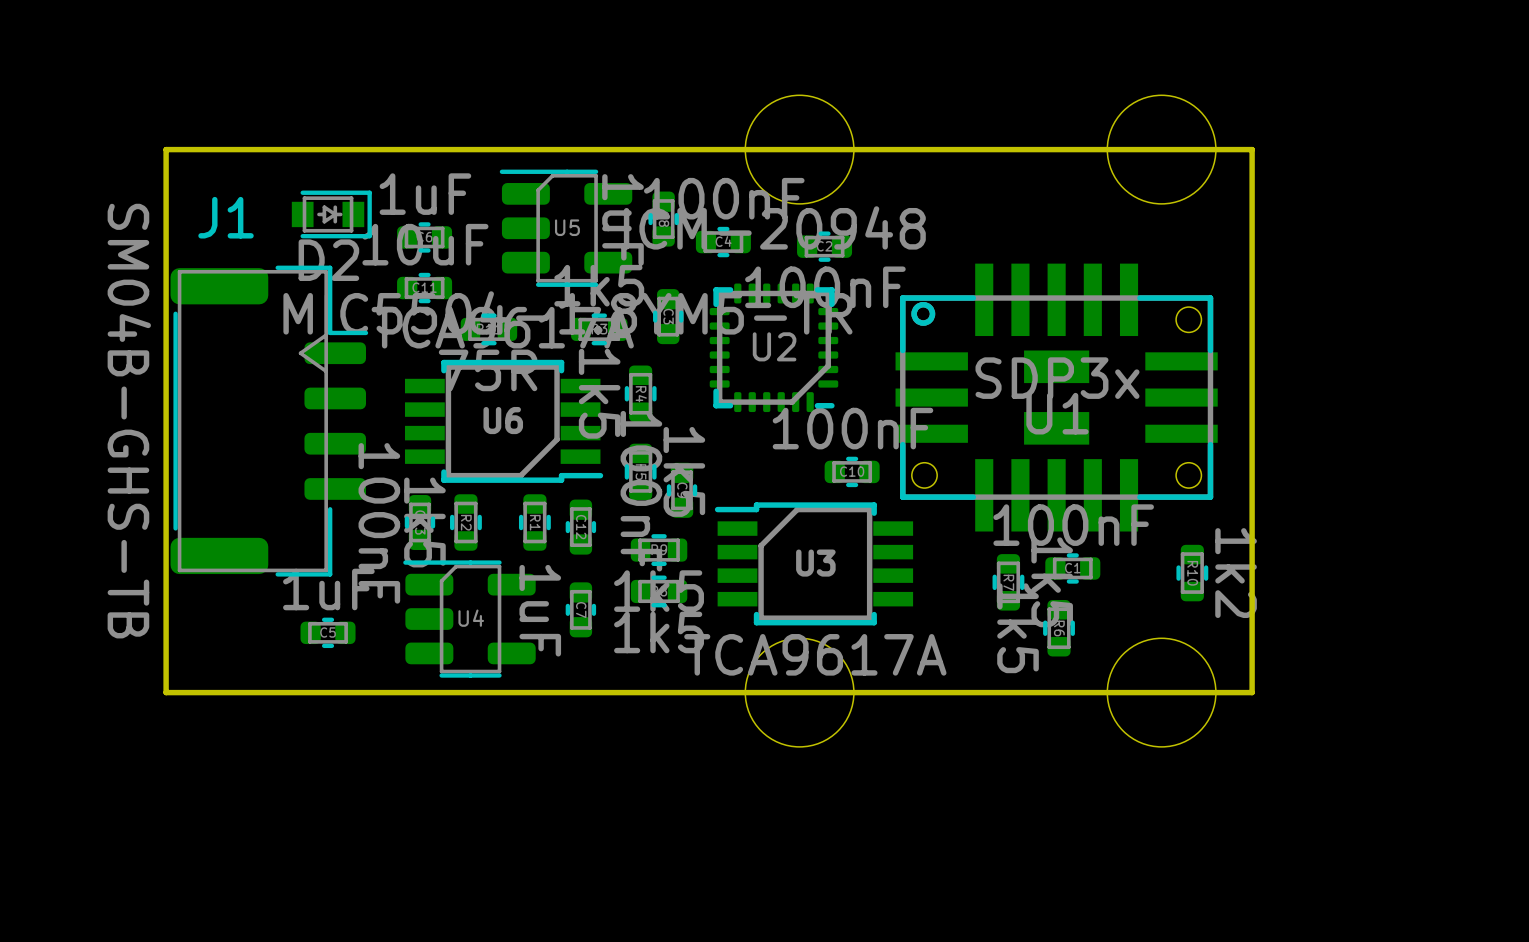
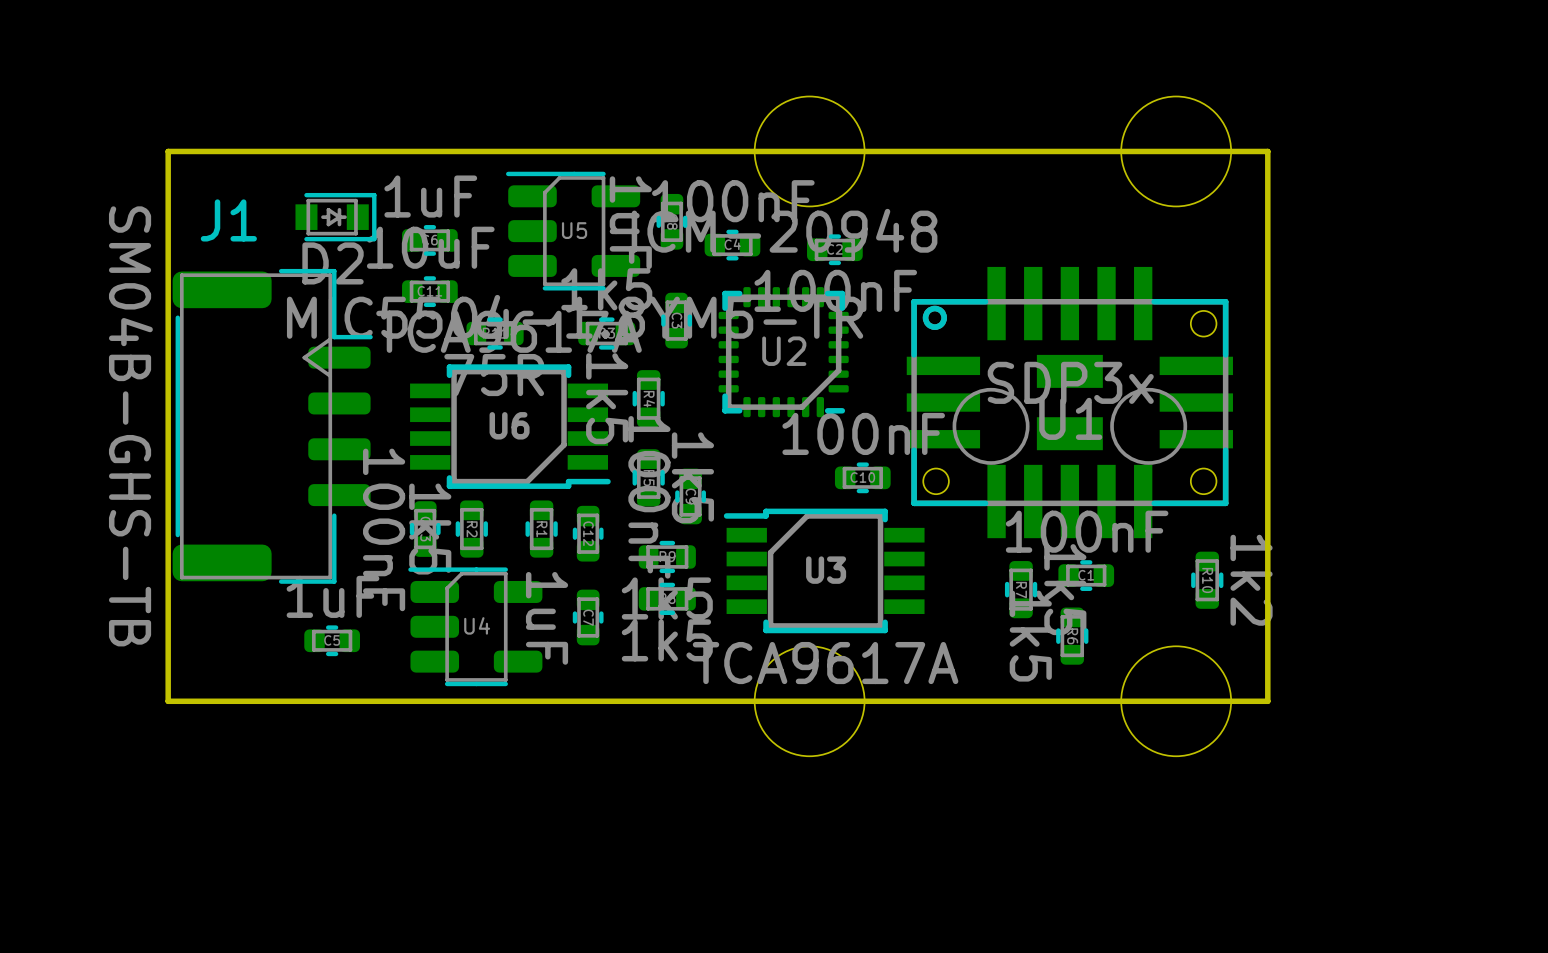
U1 footprint: [895, 263, 1218, 532] -> [906, 266, 1233, 539]

